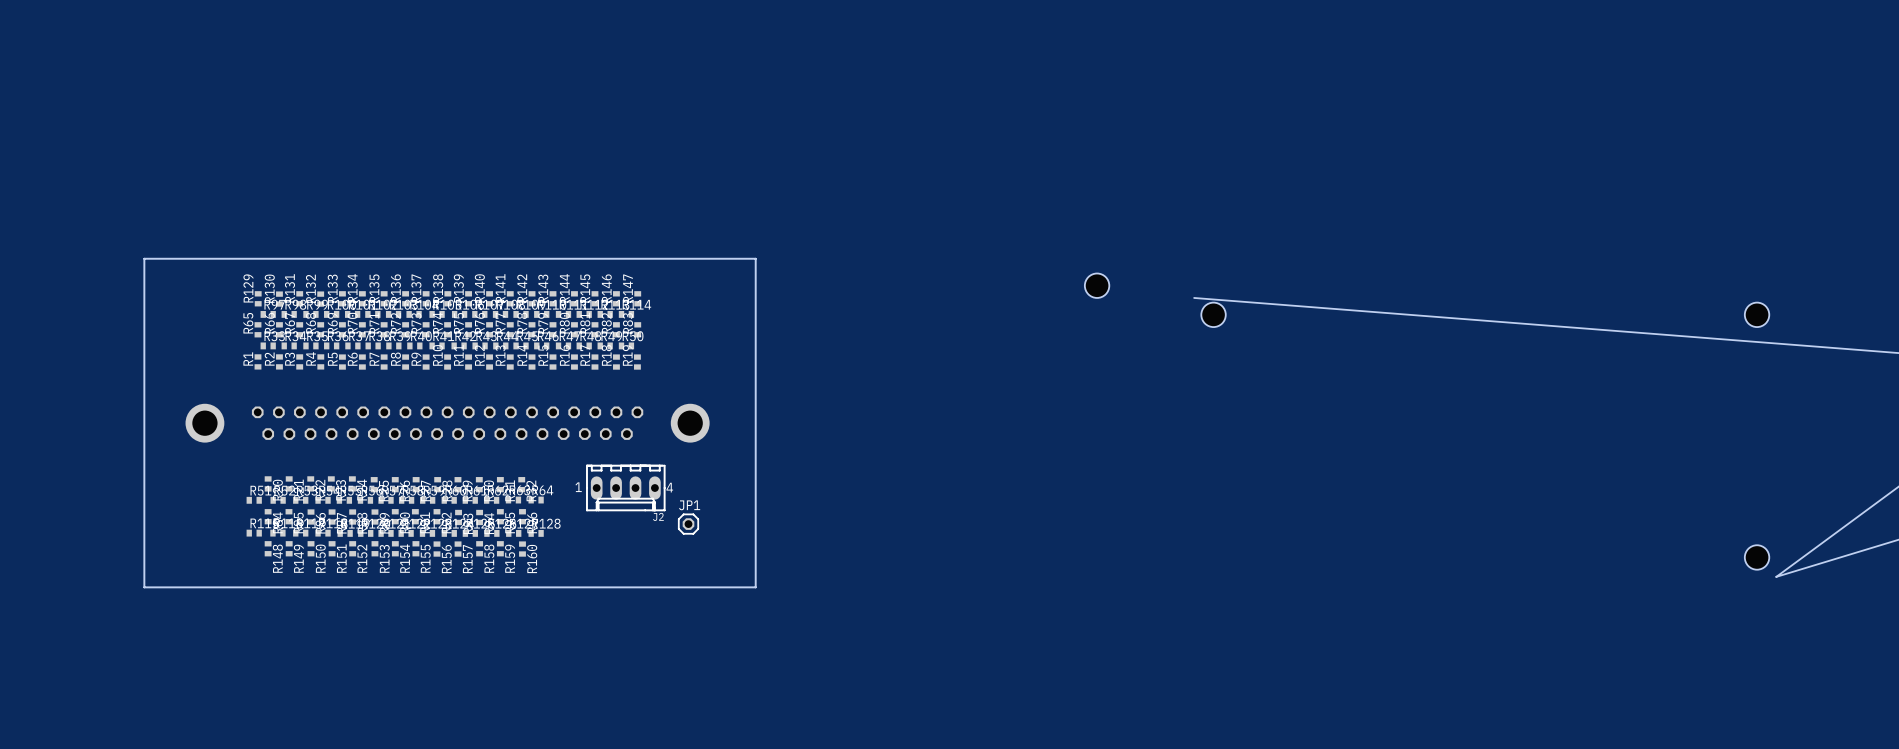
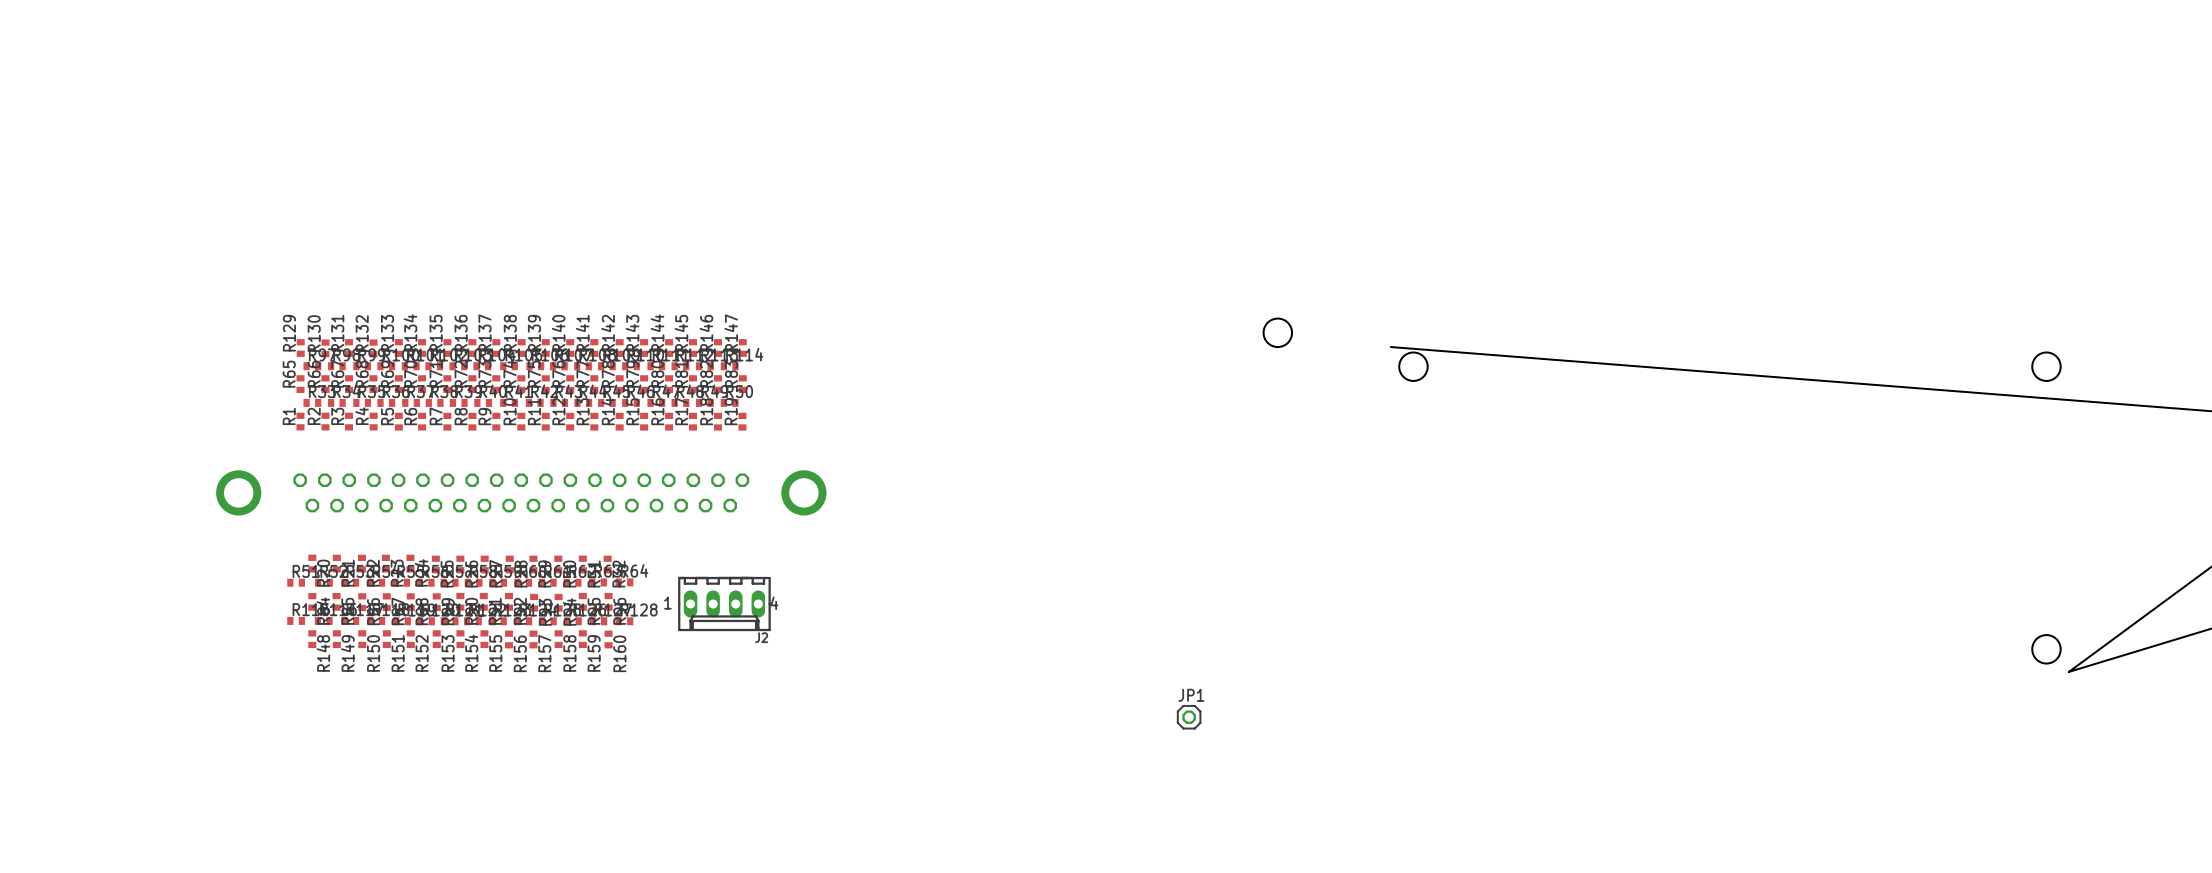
board edge: (144, 258) (755, 258) (755, 587) (144, 587) (144, 258) -> none
J2 position: (625, 488) -> (724, 604)
JP1 position: (688, 524) -> (1189, 717)

